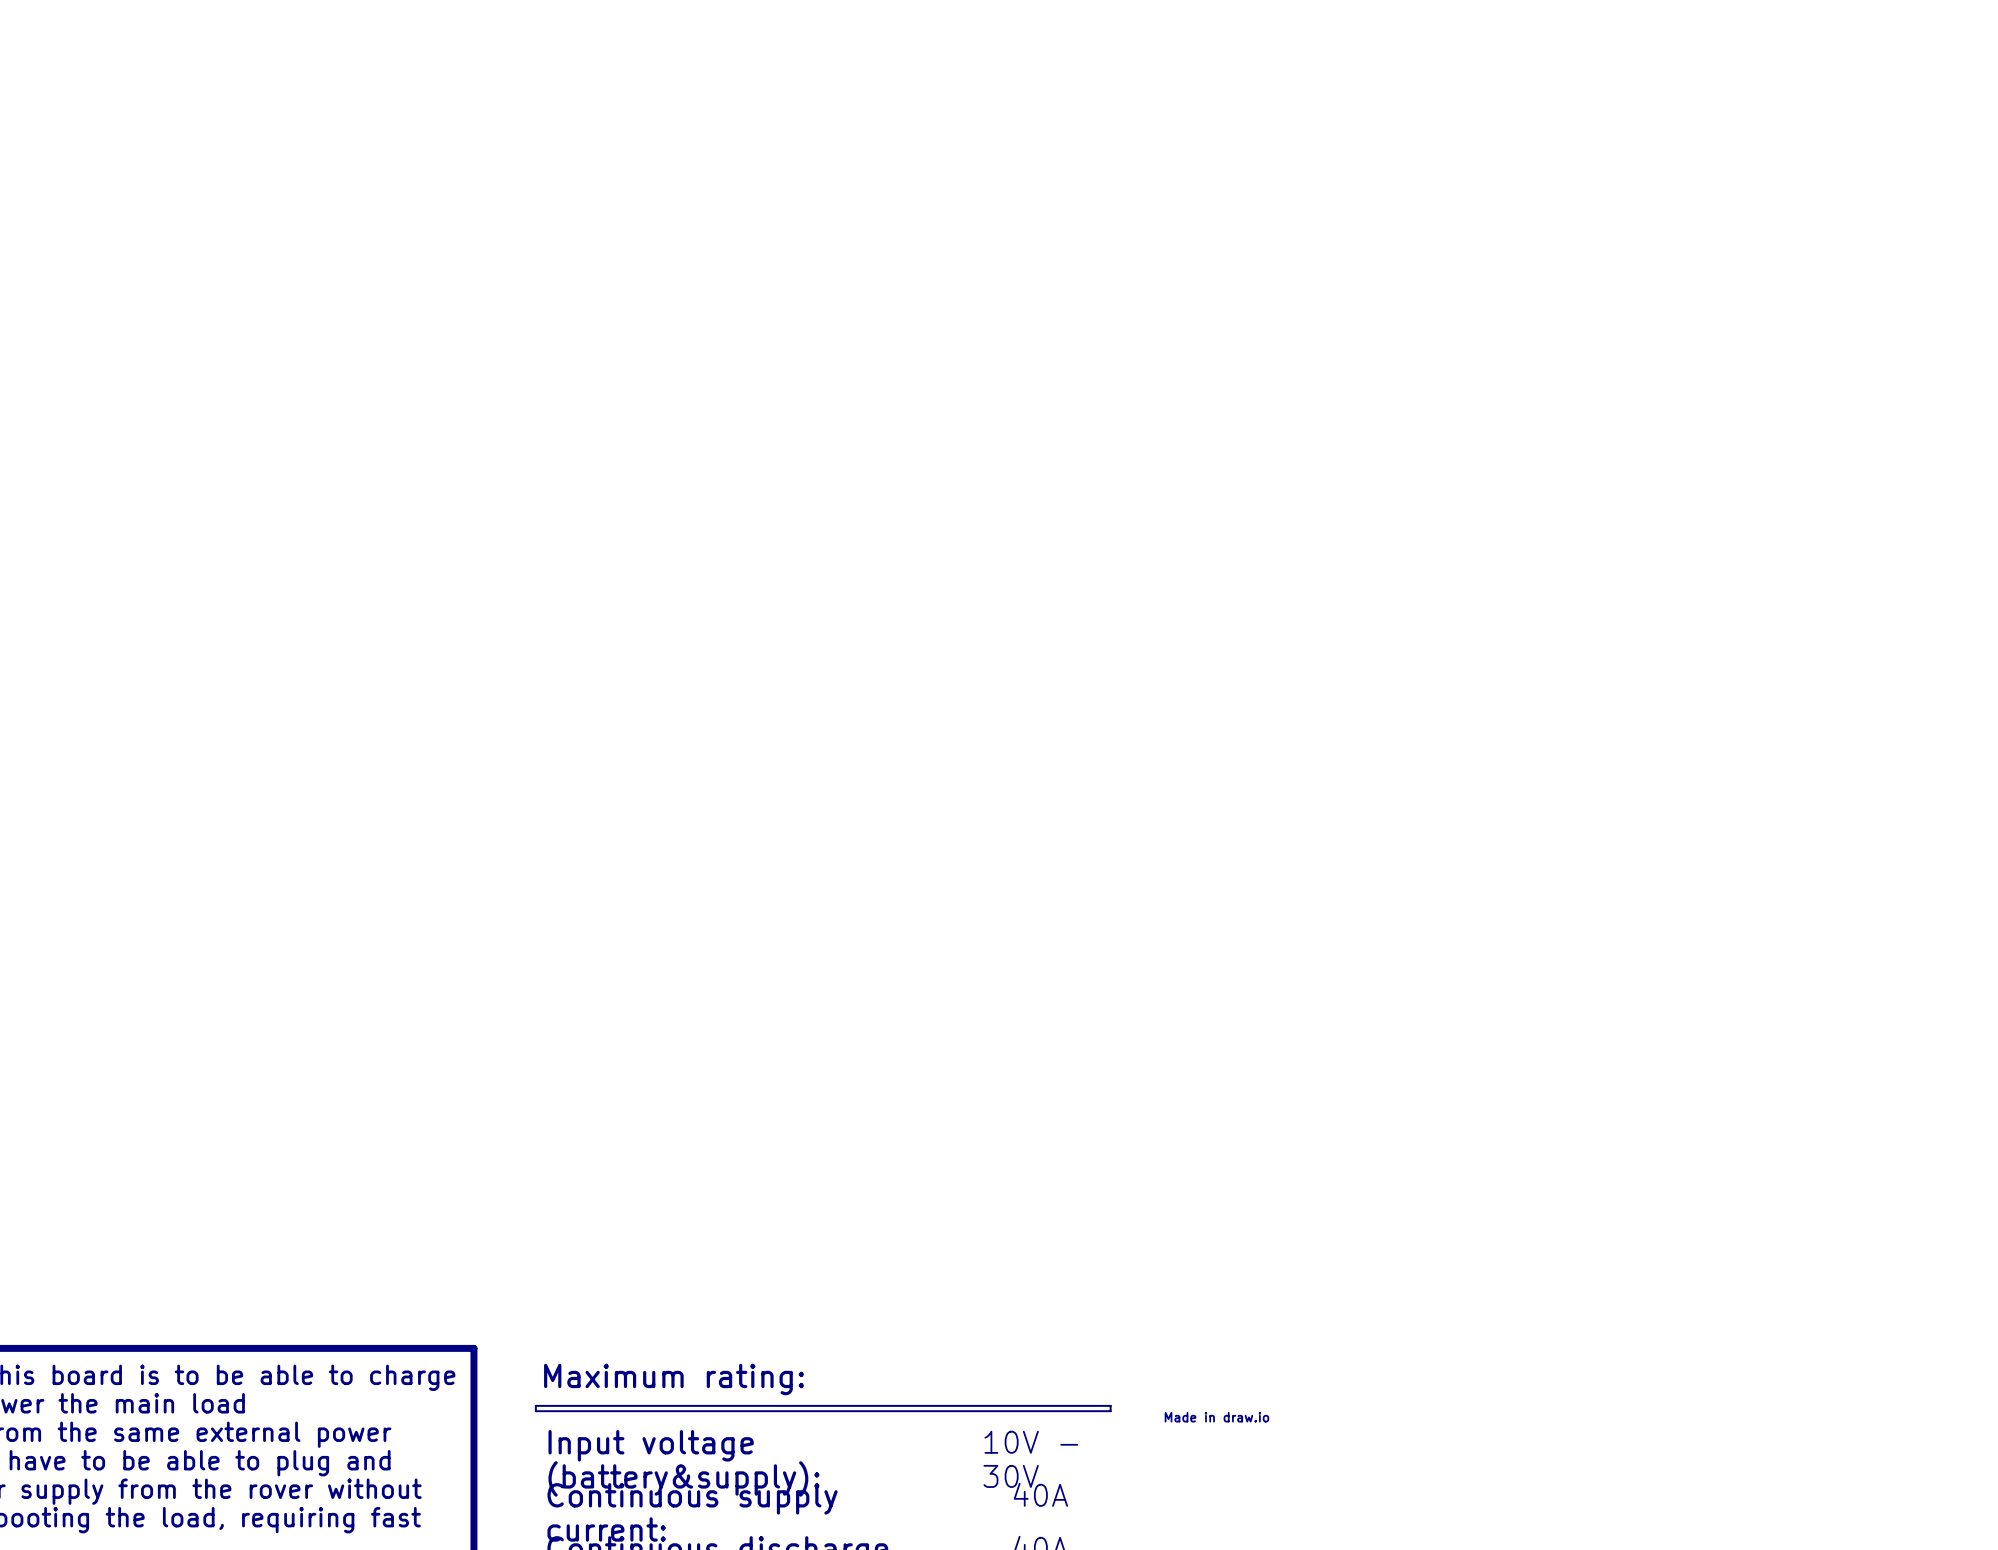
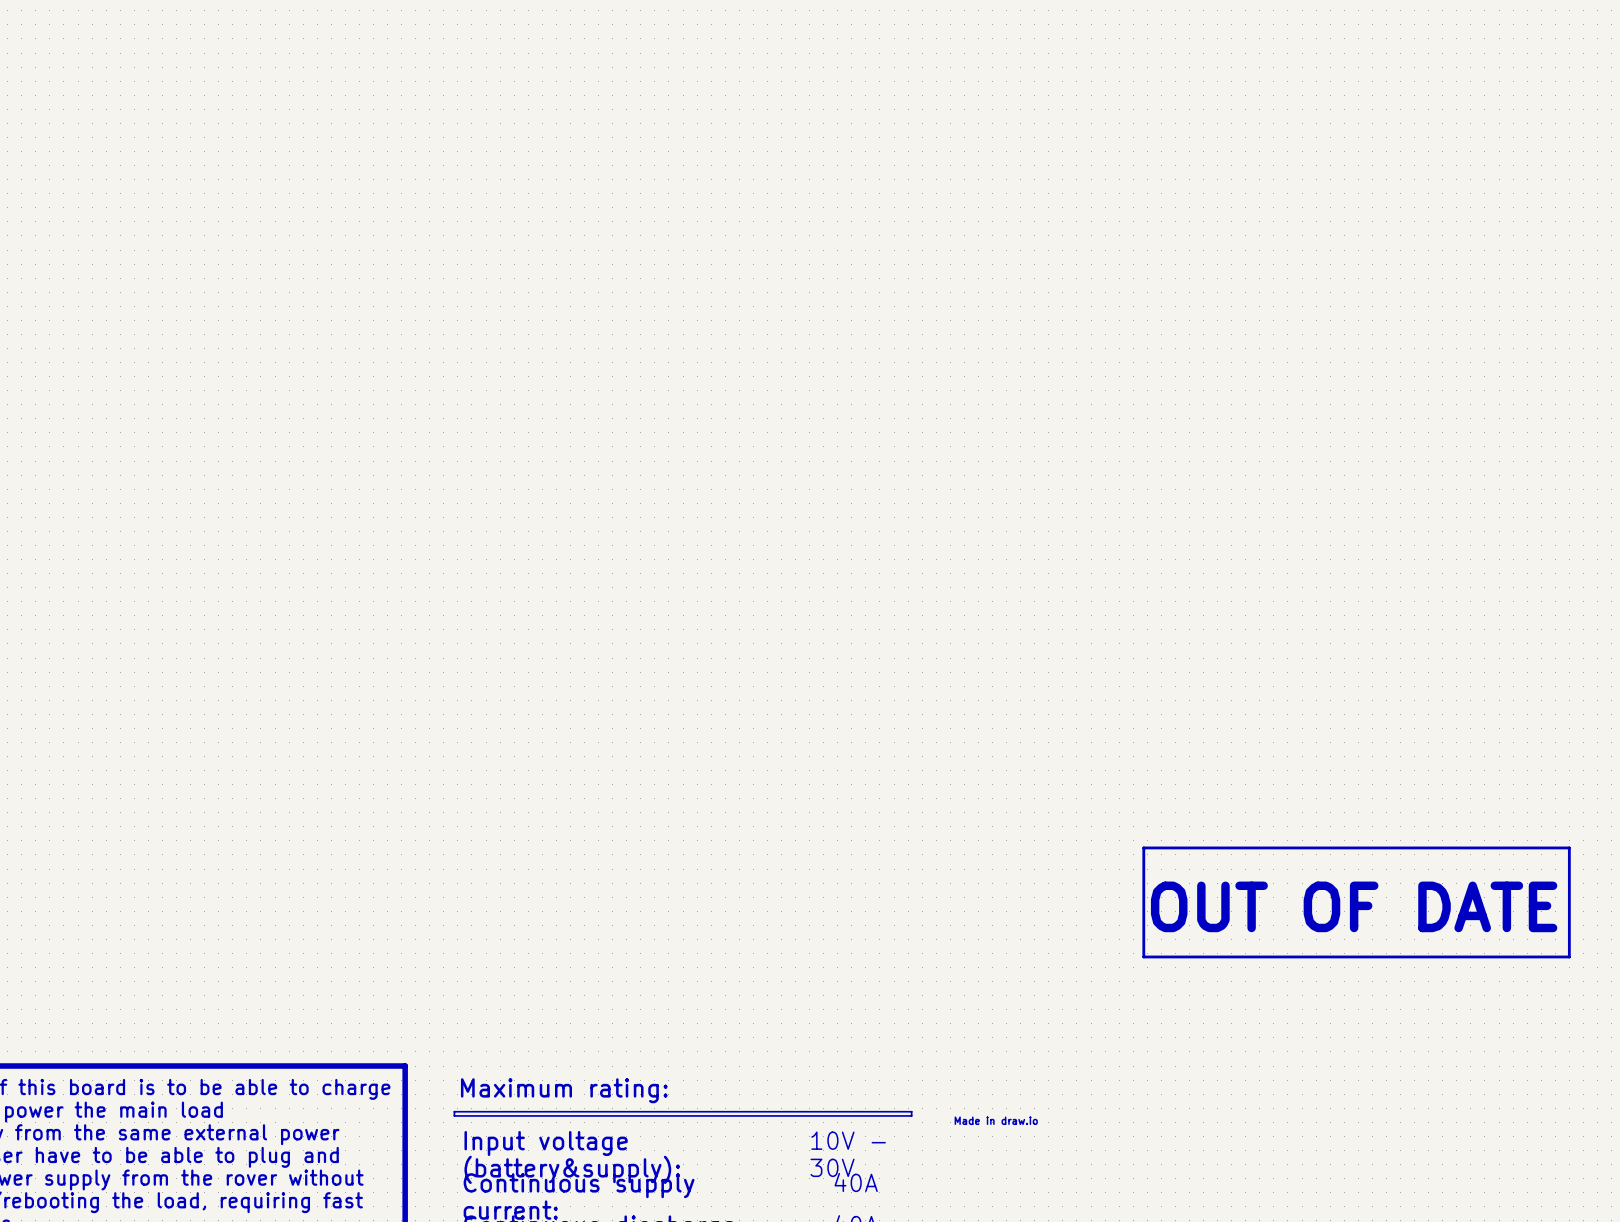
line: none -> (1143, 847) (1569, 847) (1569, 956) (1143, 956) (1143, 847)
text: none -> OUT OF DATE (1354, 906)

